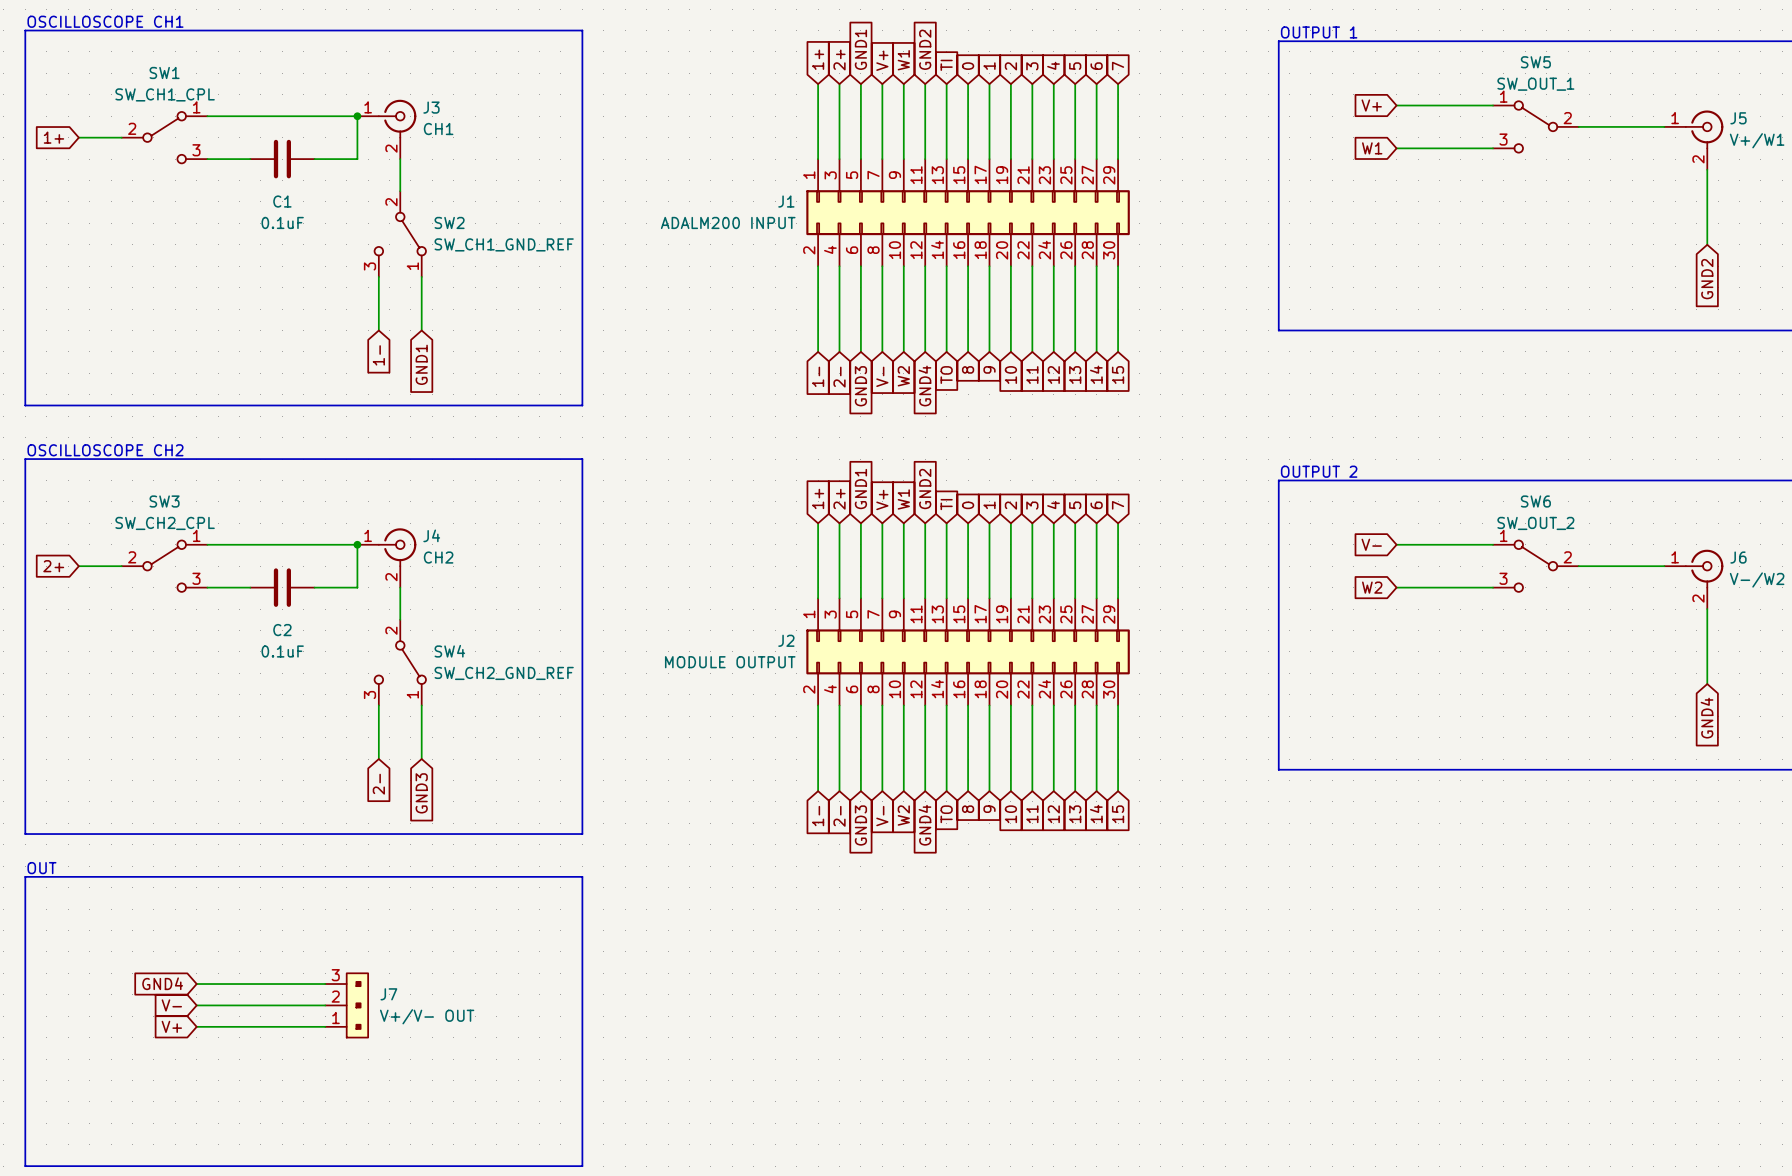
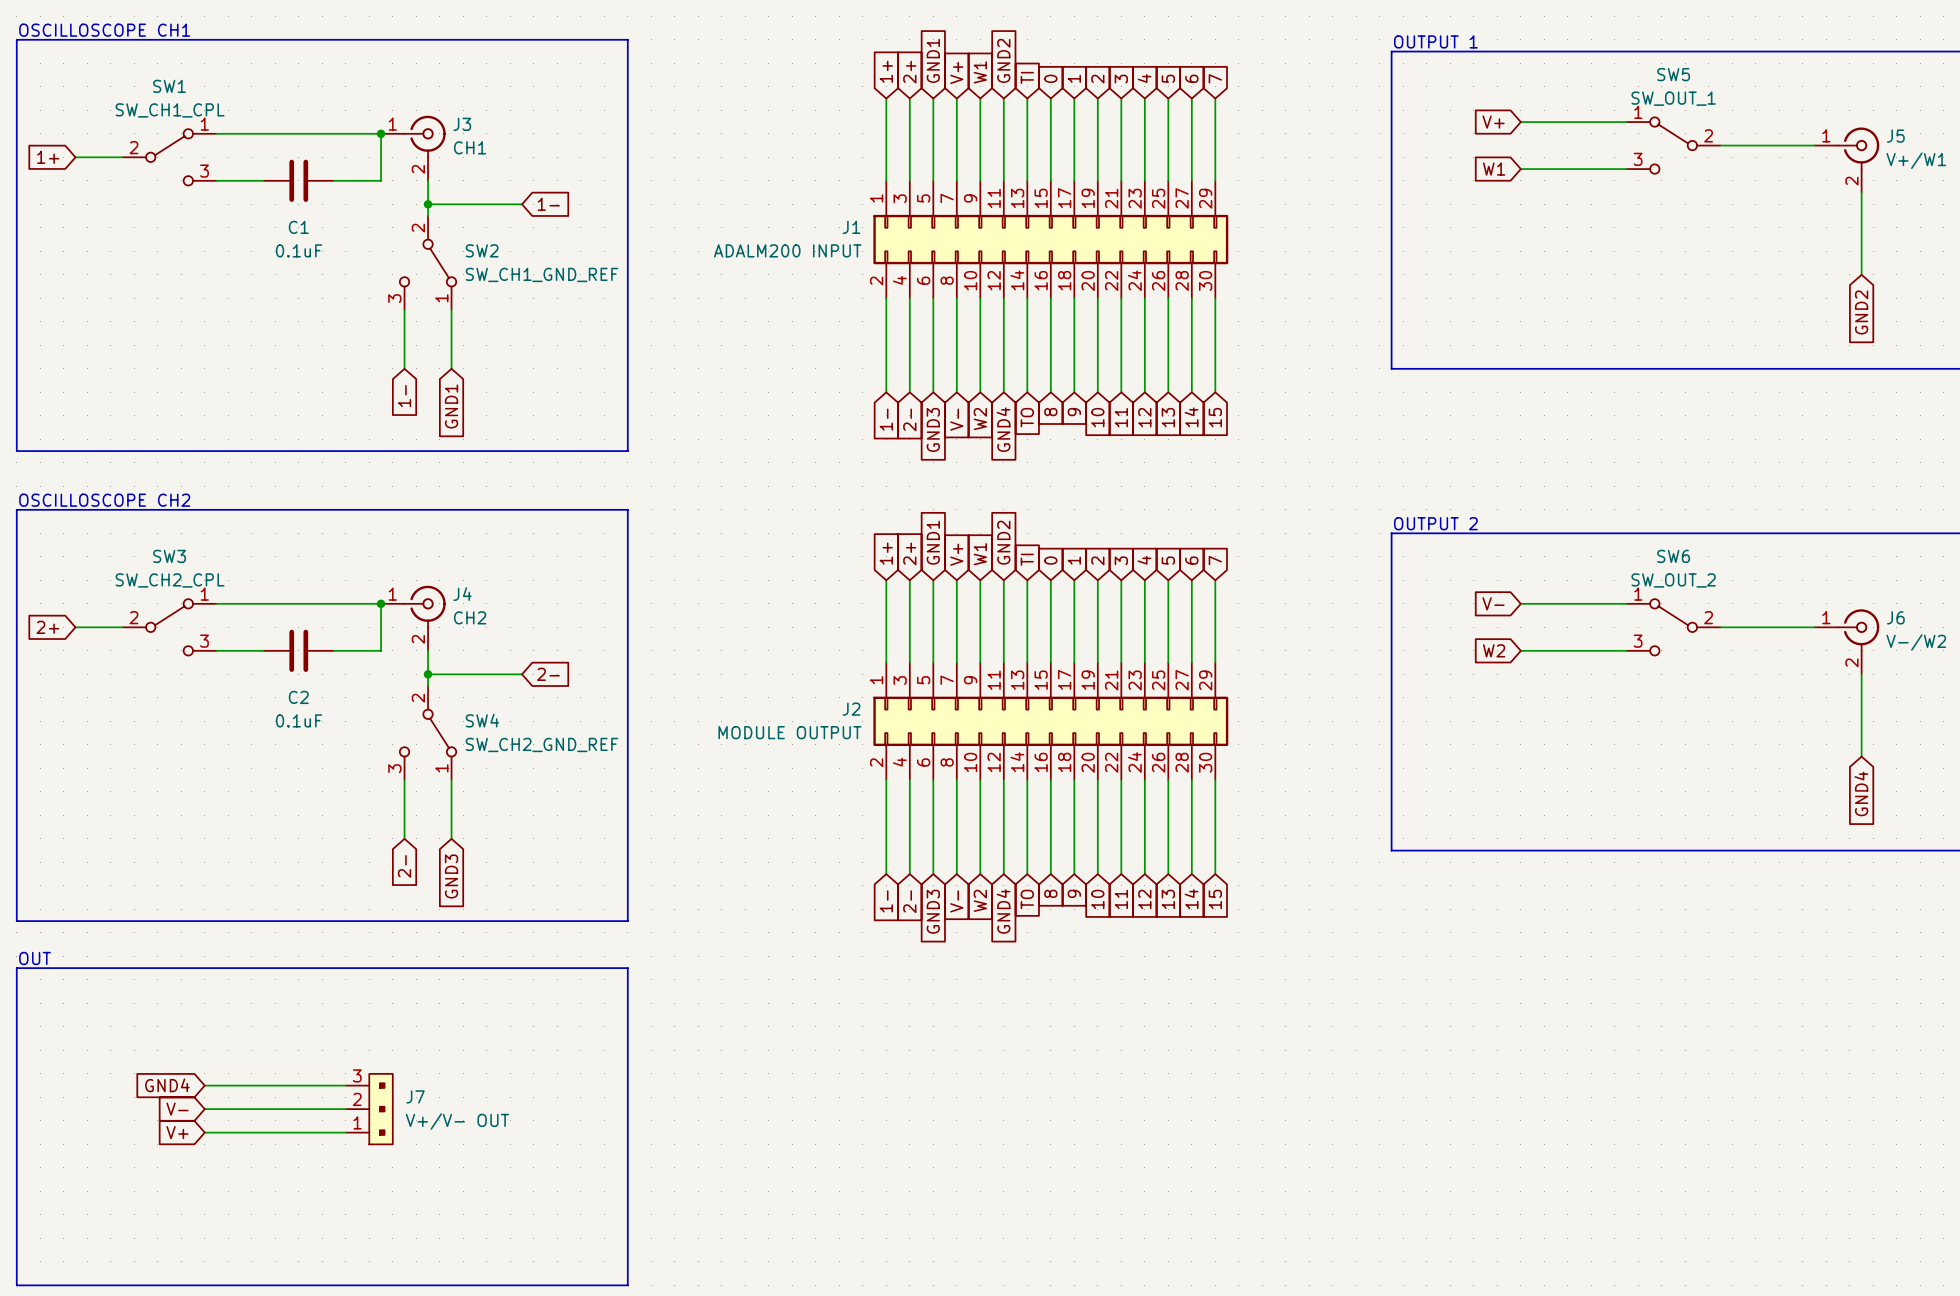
wire: none -> (428, 204) (522, 204)
junction: none -> (428, 204)
global label: none -> 1- (548, 204)
wire: none -> (428, 674) (522, 674)
junction: none -> (428, 674)
global label: none -> 2- (548, 674)

